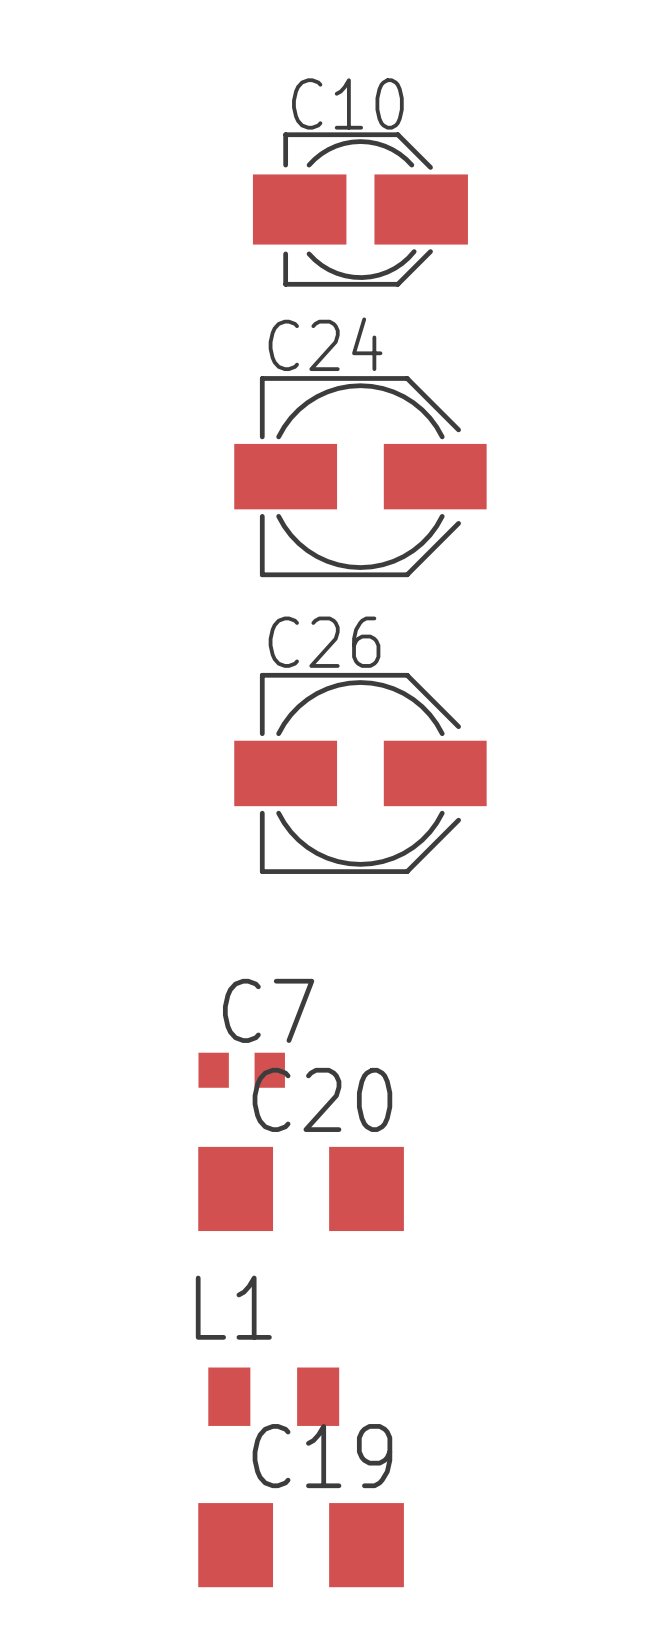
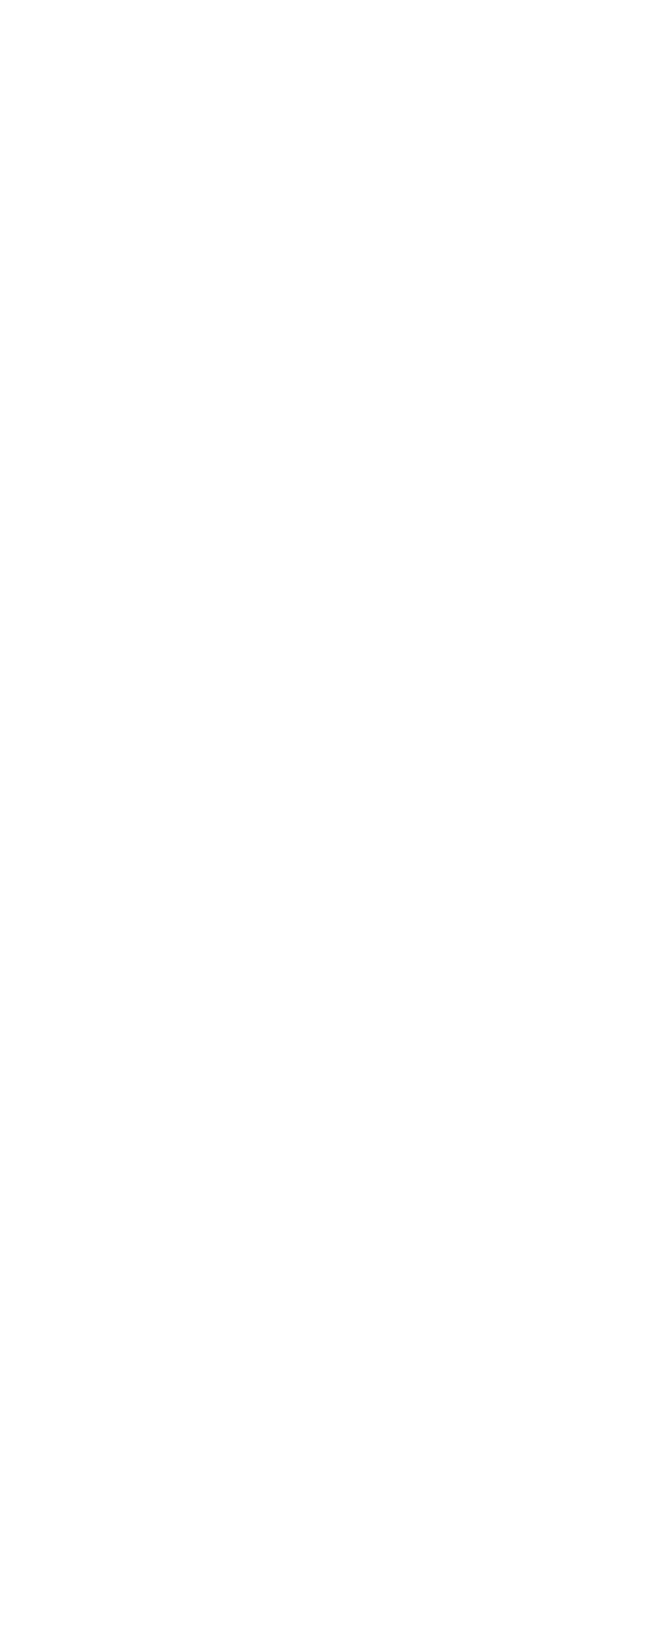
C10: (360, 209) -> none
C24: (360, 476) -> none
C26: (360, 773) -> none
C7: (241, 1070) -> none
C20: (301, 1188) -> none
L1: (273, 1396) -> none
C19: (301, 1545) -> none

